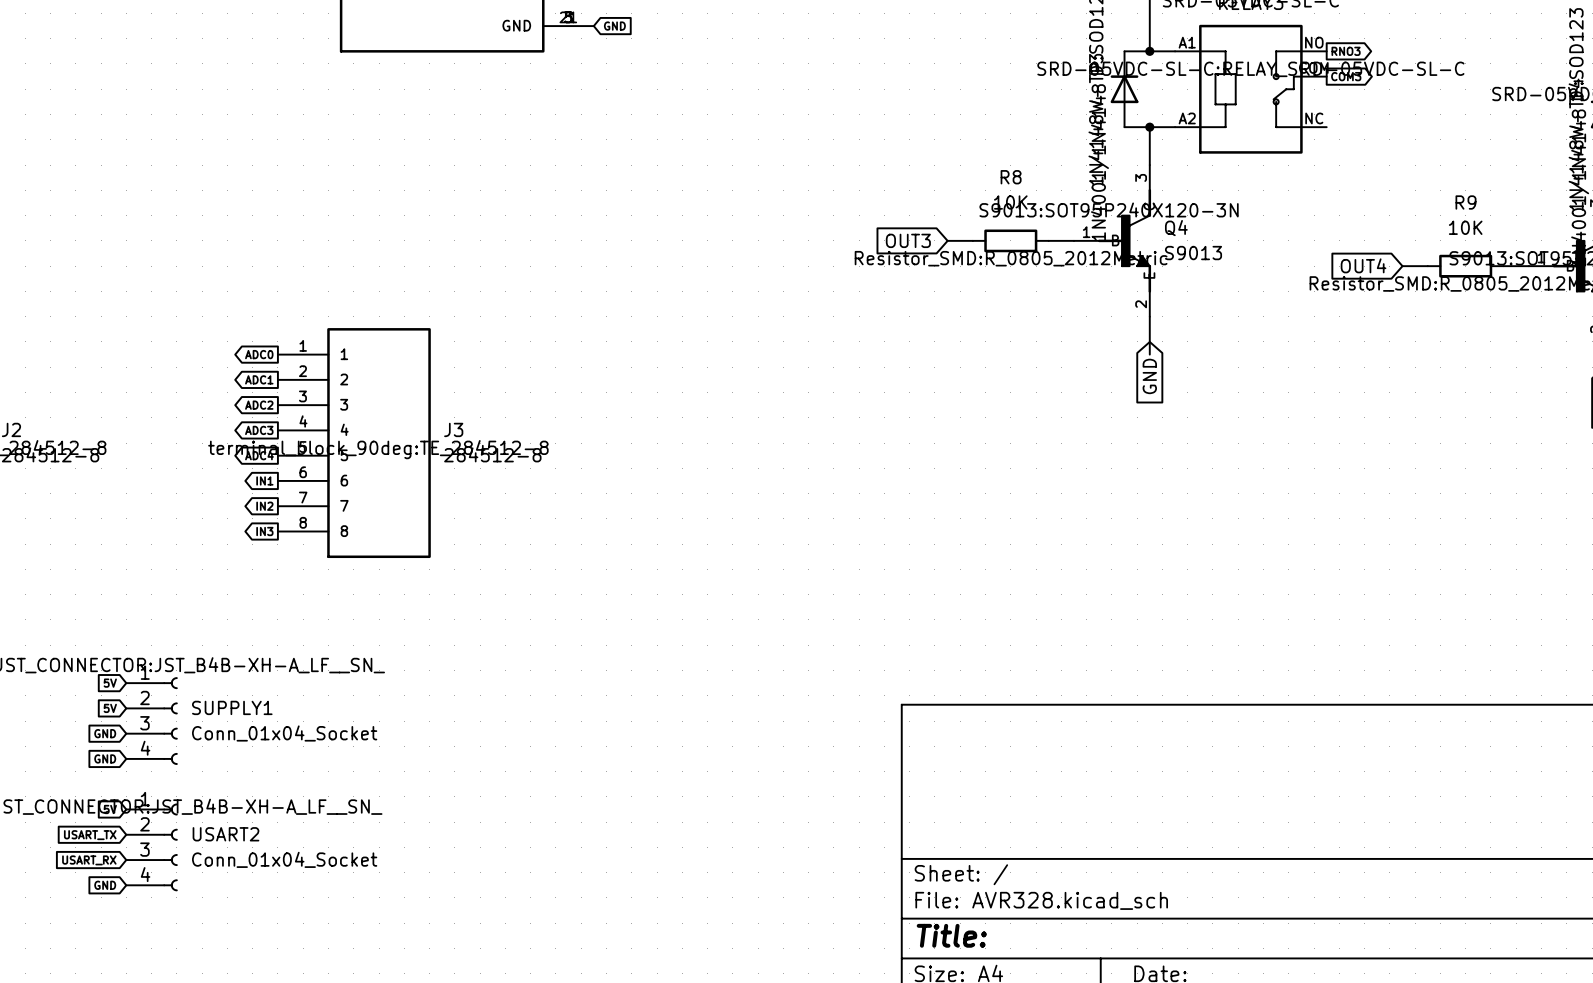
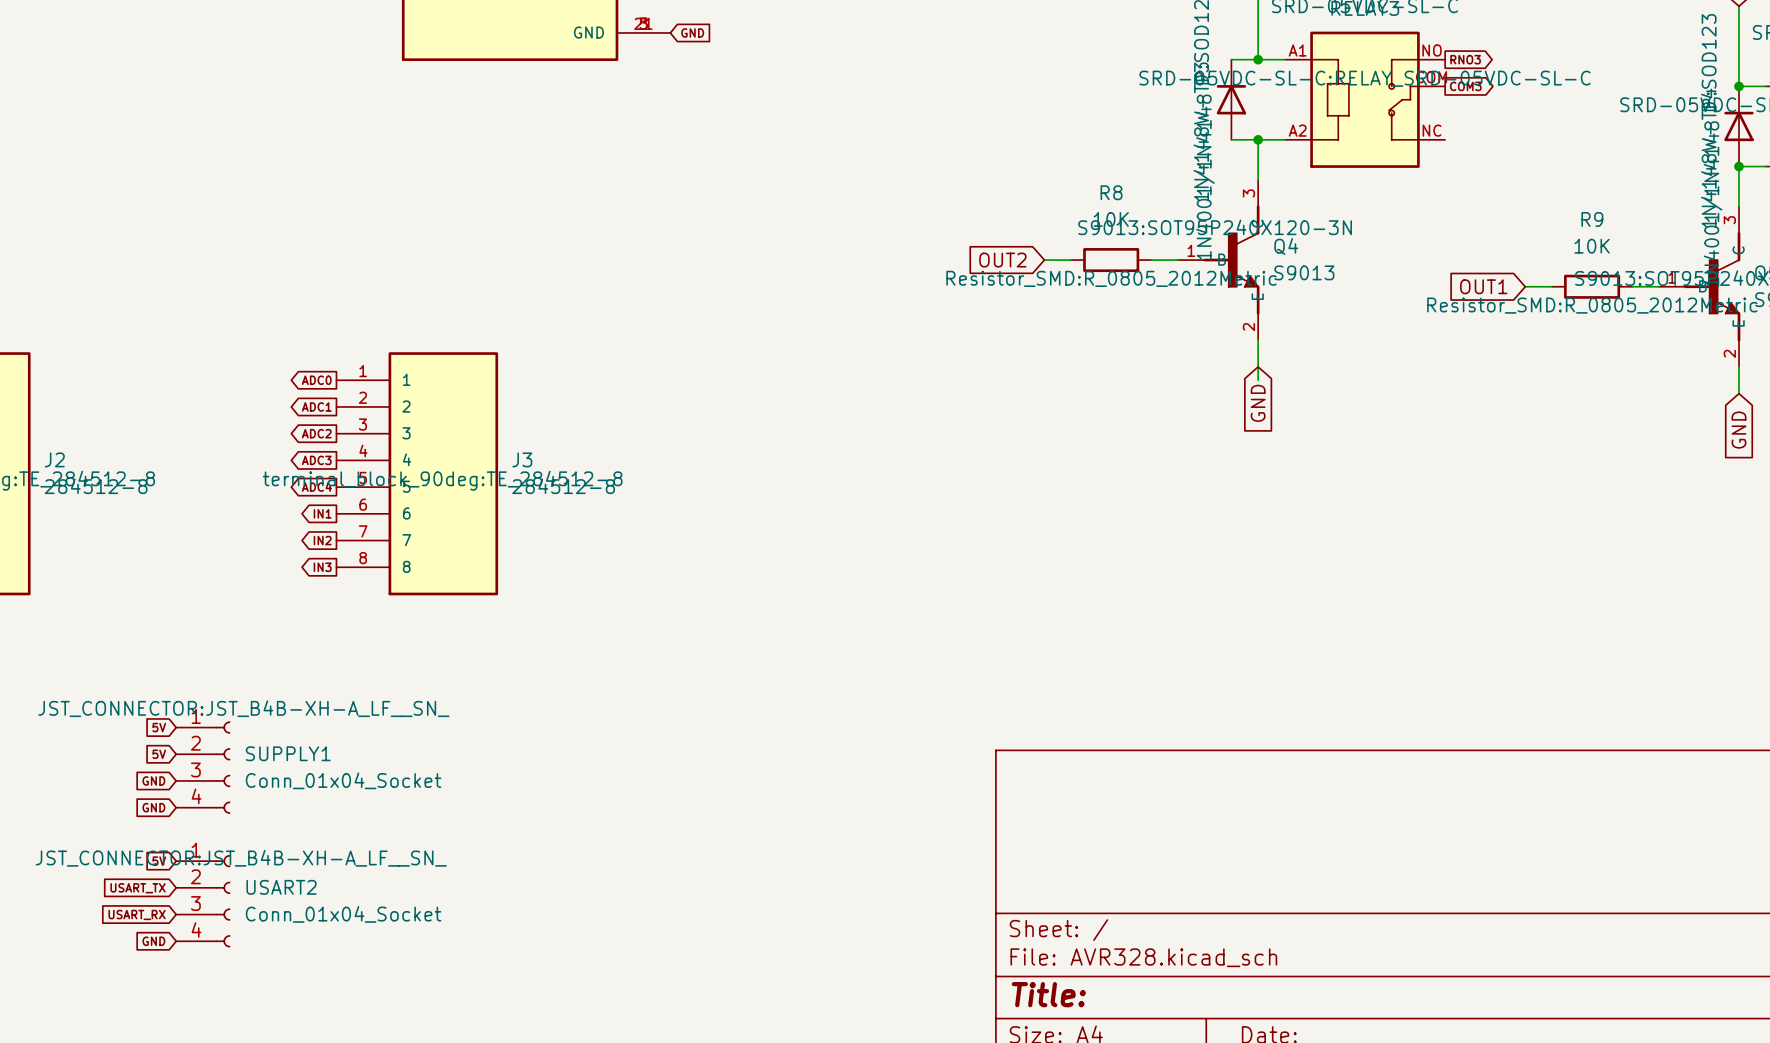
global label: OUT3 (908, 240) -> OUT2 (1002, 260)
global label: OUT4 (1363, 265) -> OUT1 (1483, 286)

